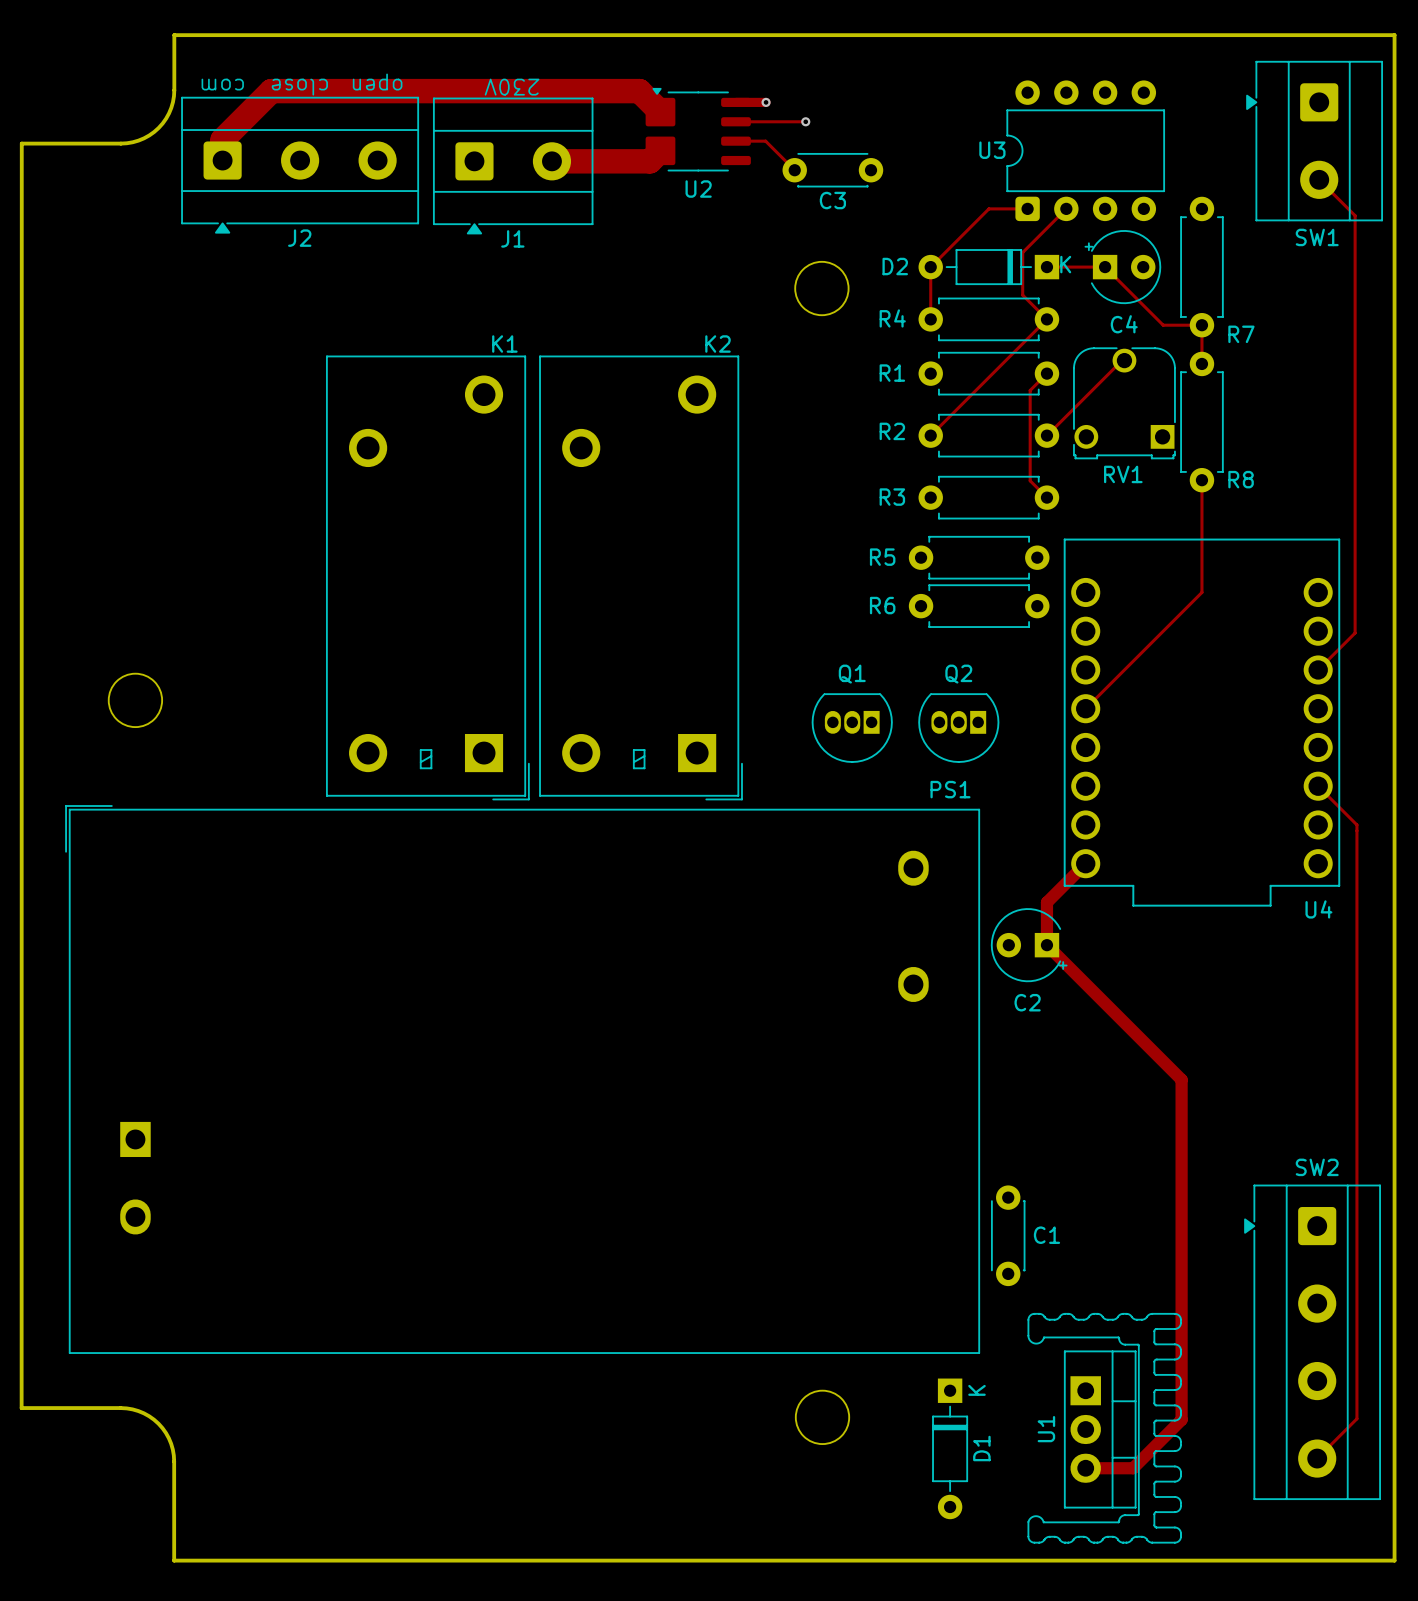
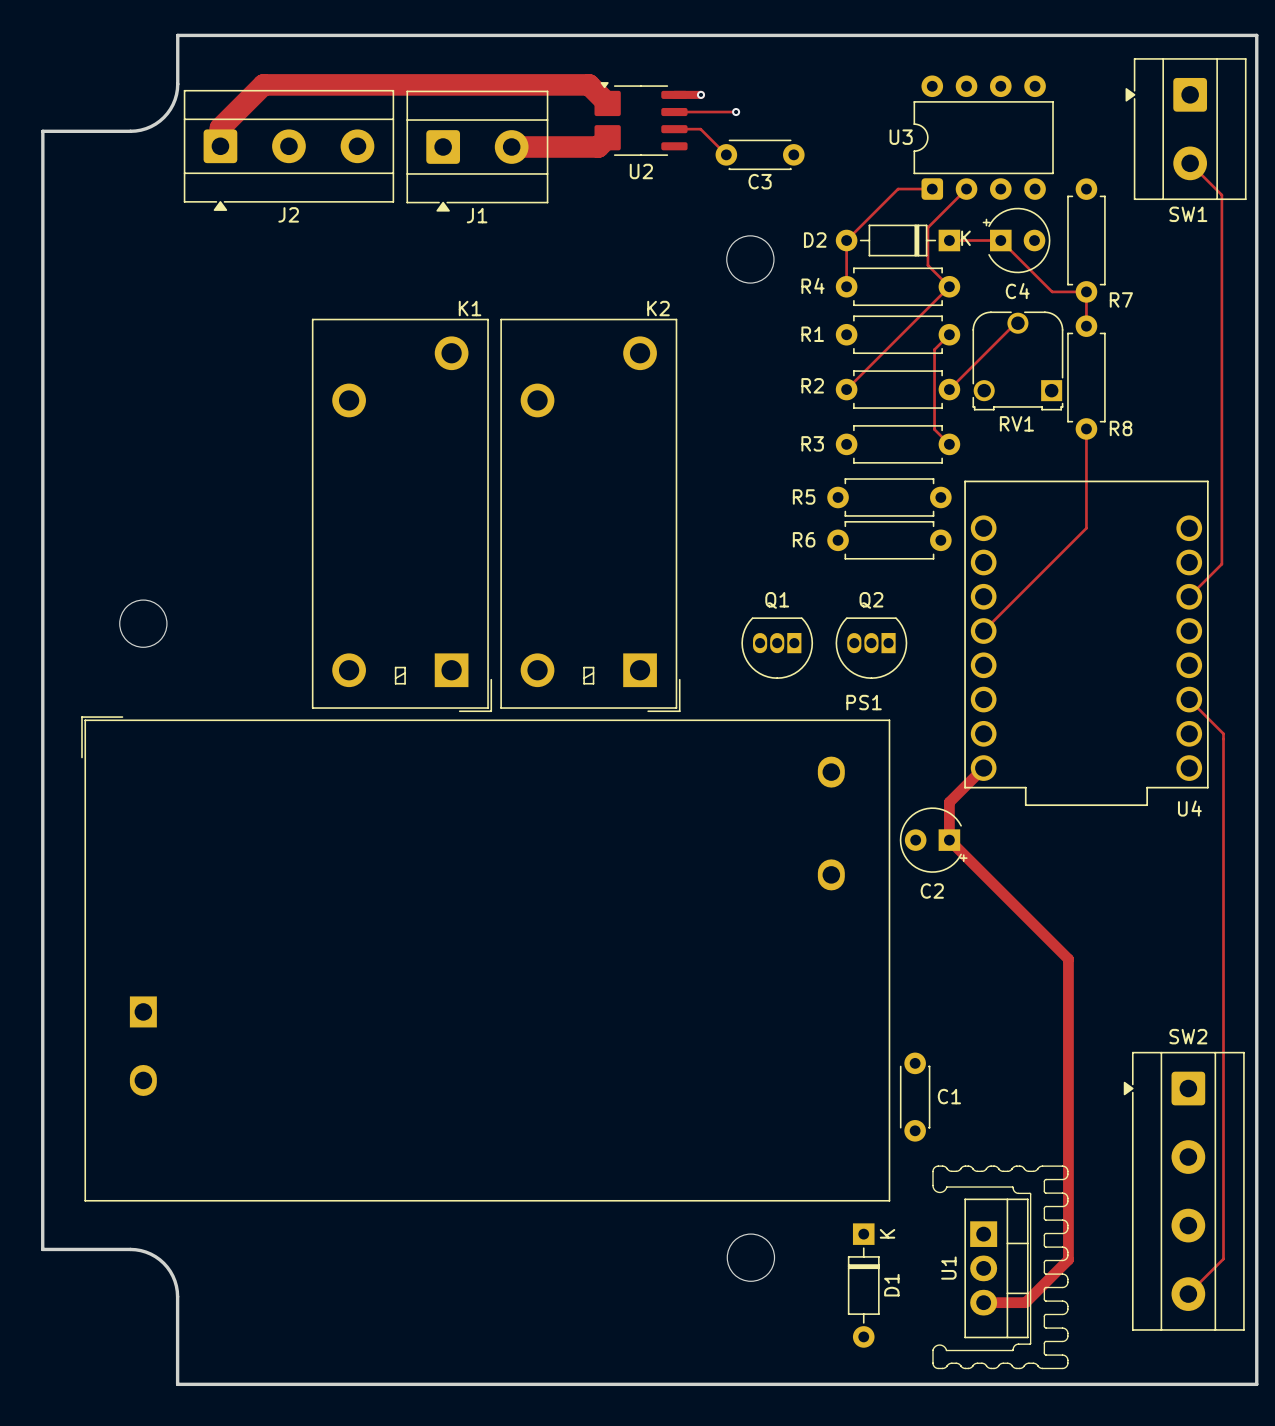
J2 text: open (377, 82) -> none
J2 text: com (222, 84) -> none
J2 text: close (299, 87) -> none
J1 text: 230V (512, 87) -> none

